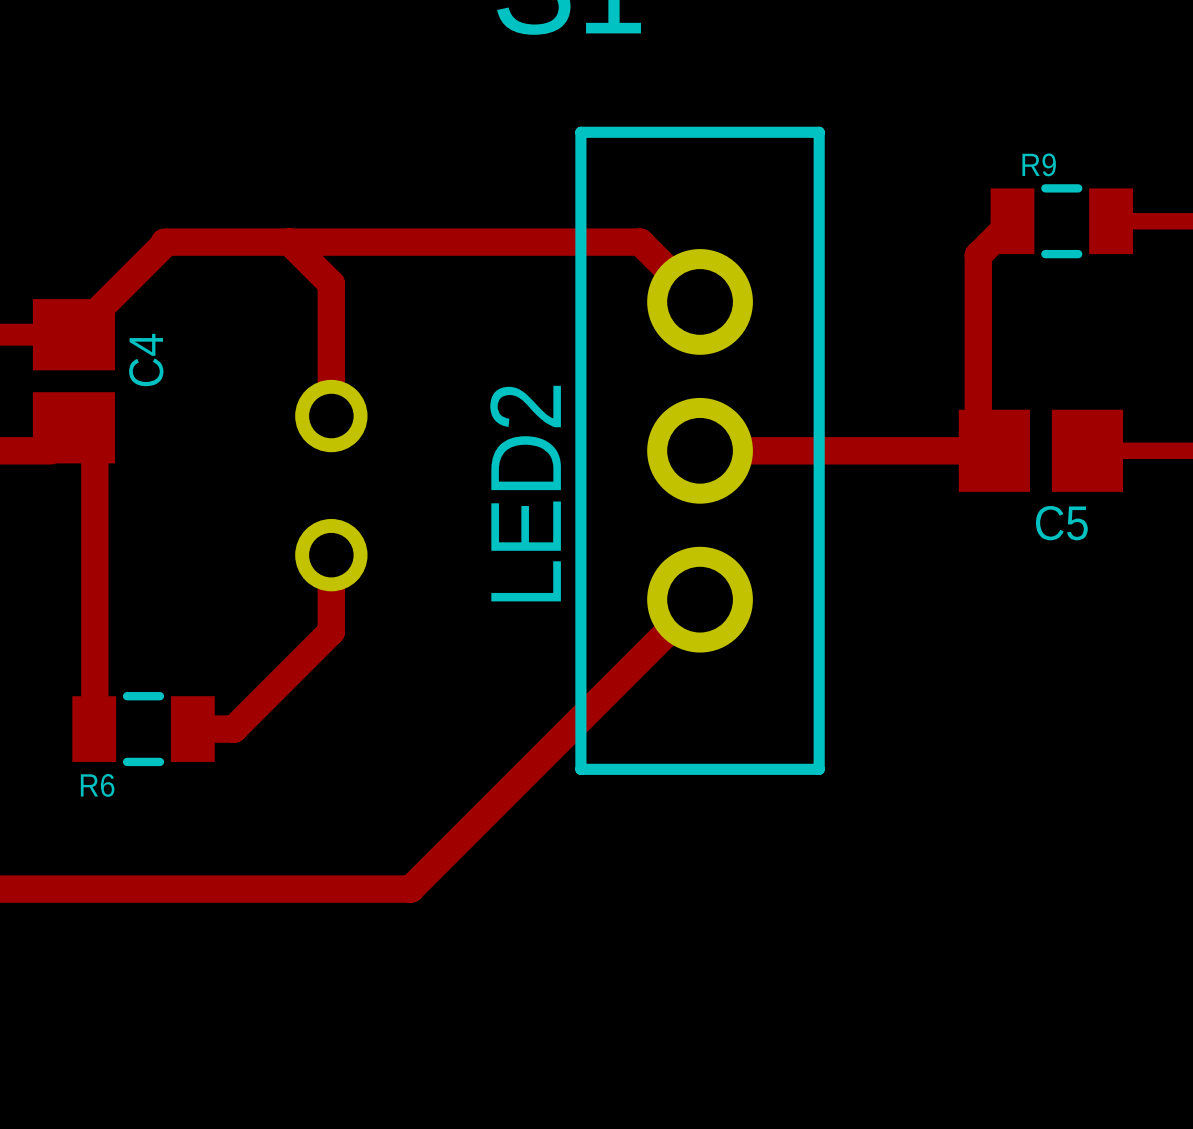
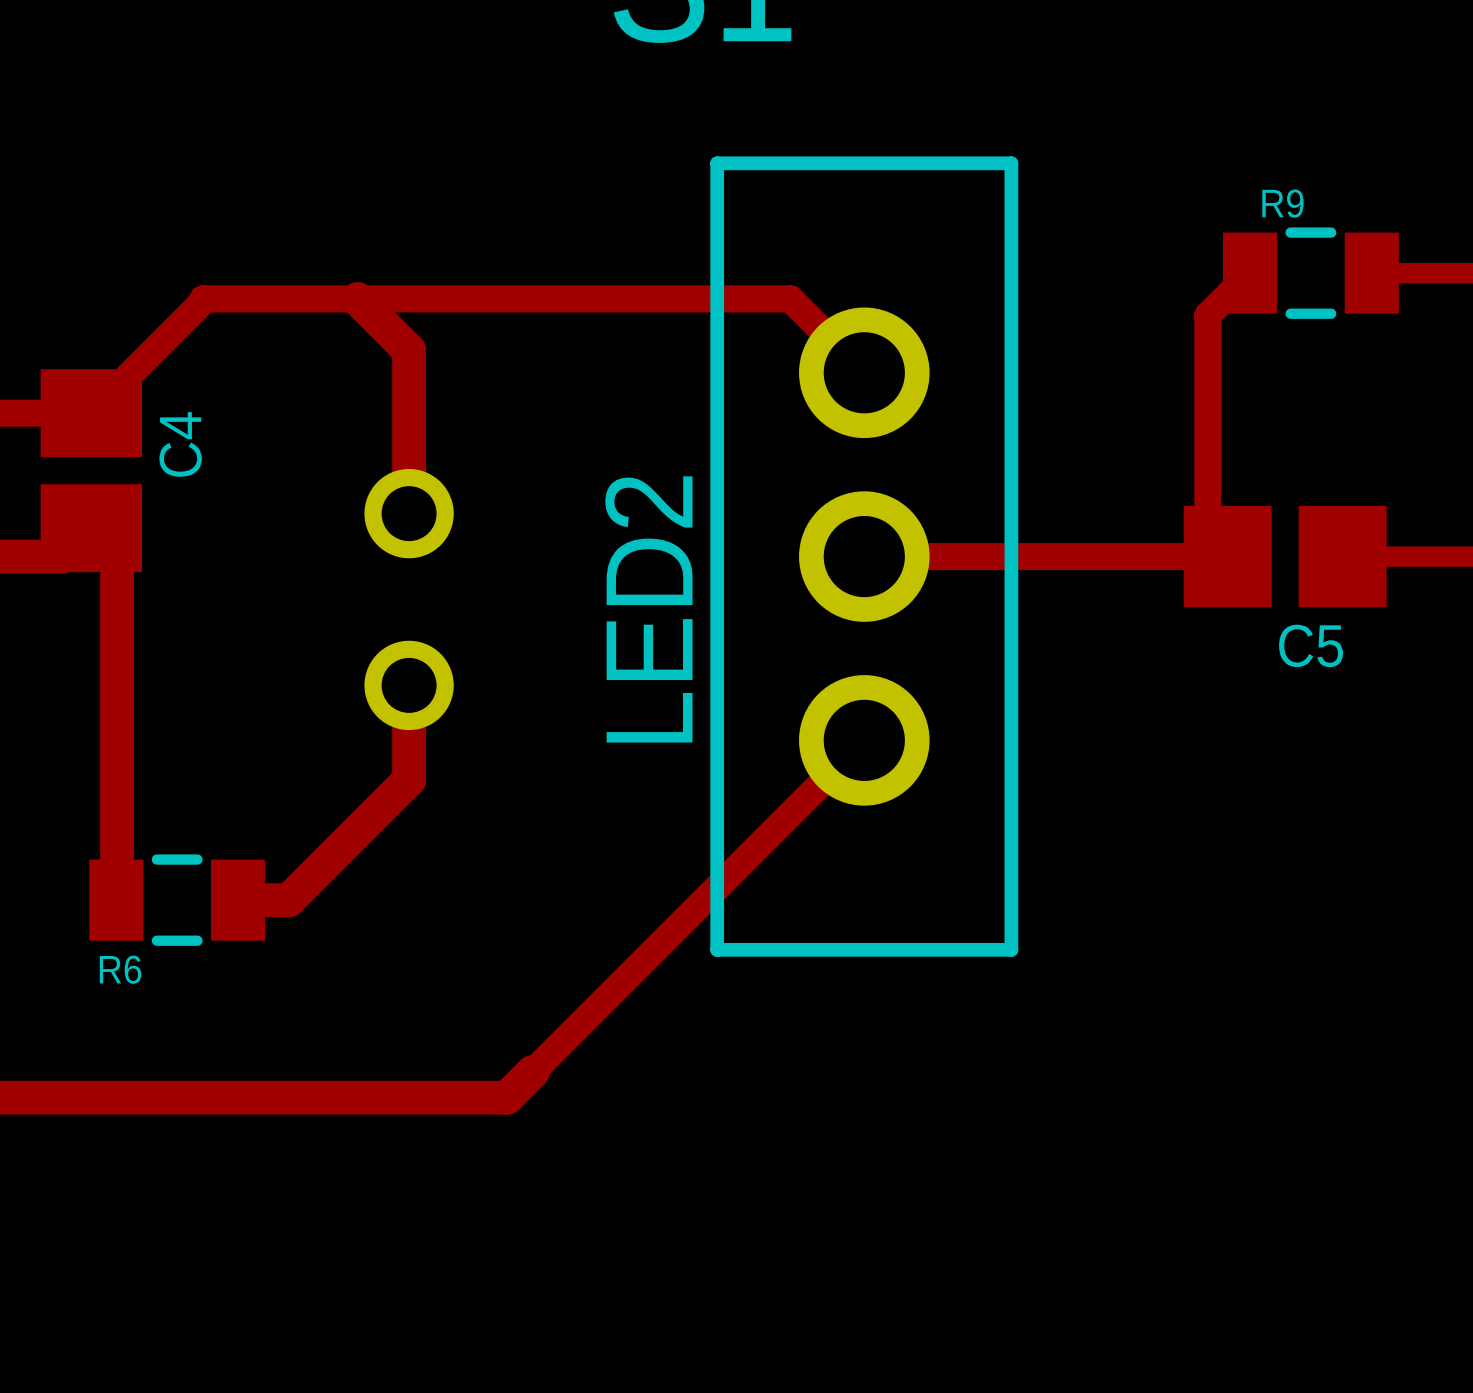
track width: thick (1012, 221) (978, 255) (978, 450) (700, 450) -> thin (1250, 273) (1207, 315) (1207, 556) (864, 556)
track width: thick (164, 242) (640, 242) (700, 301) -> thin (202, 298) (790, 298) (864, 372)
track width: thick (164, 244) (73, 334) -> thin (202, 301) (91, 413)
track width: thick (700, 599) (431, 868) -> thin (864, 740) (532, 1071)

